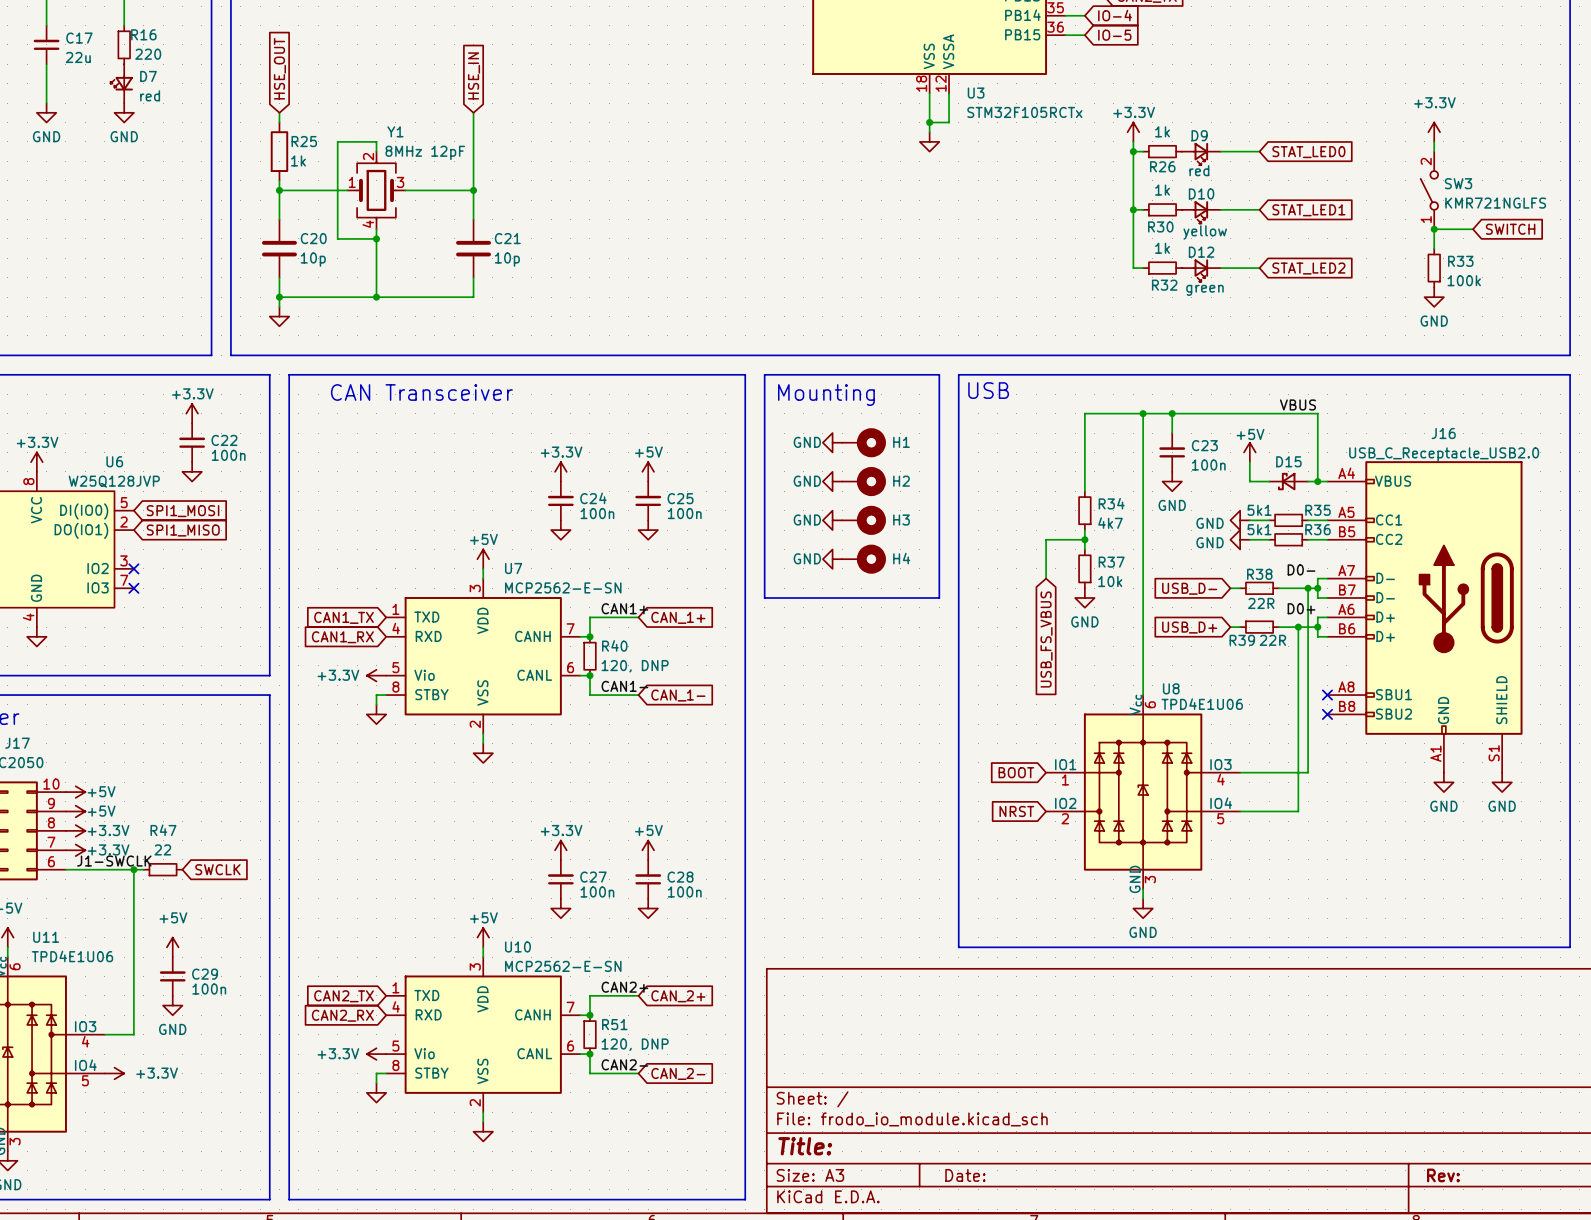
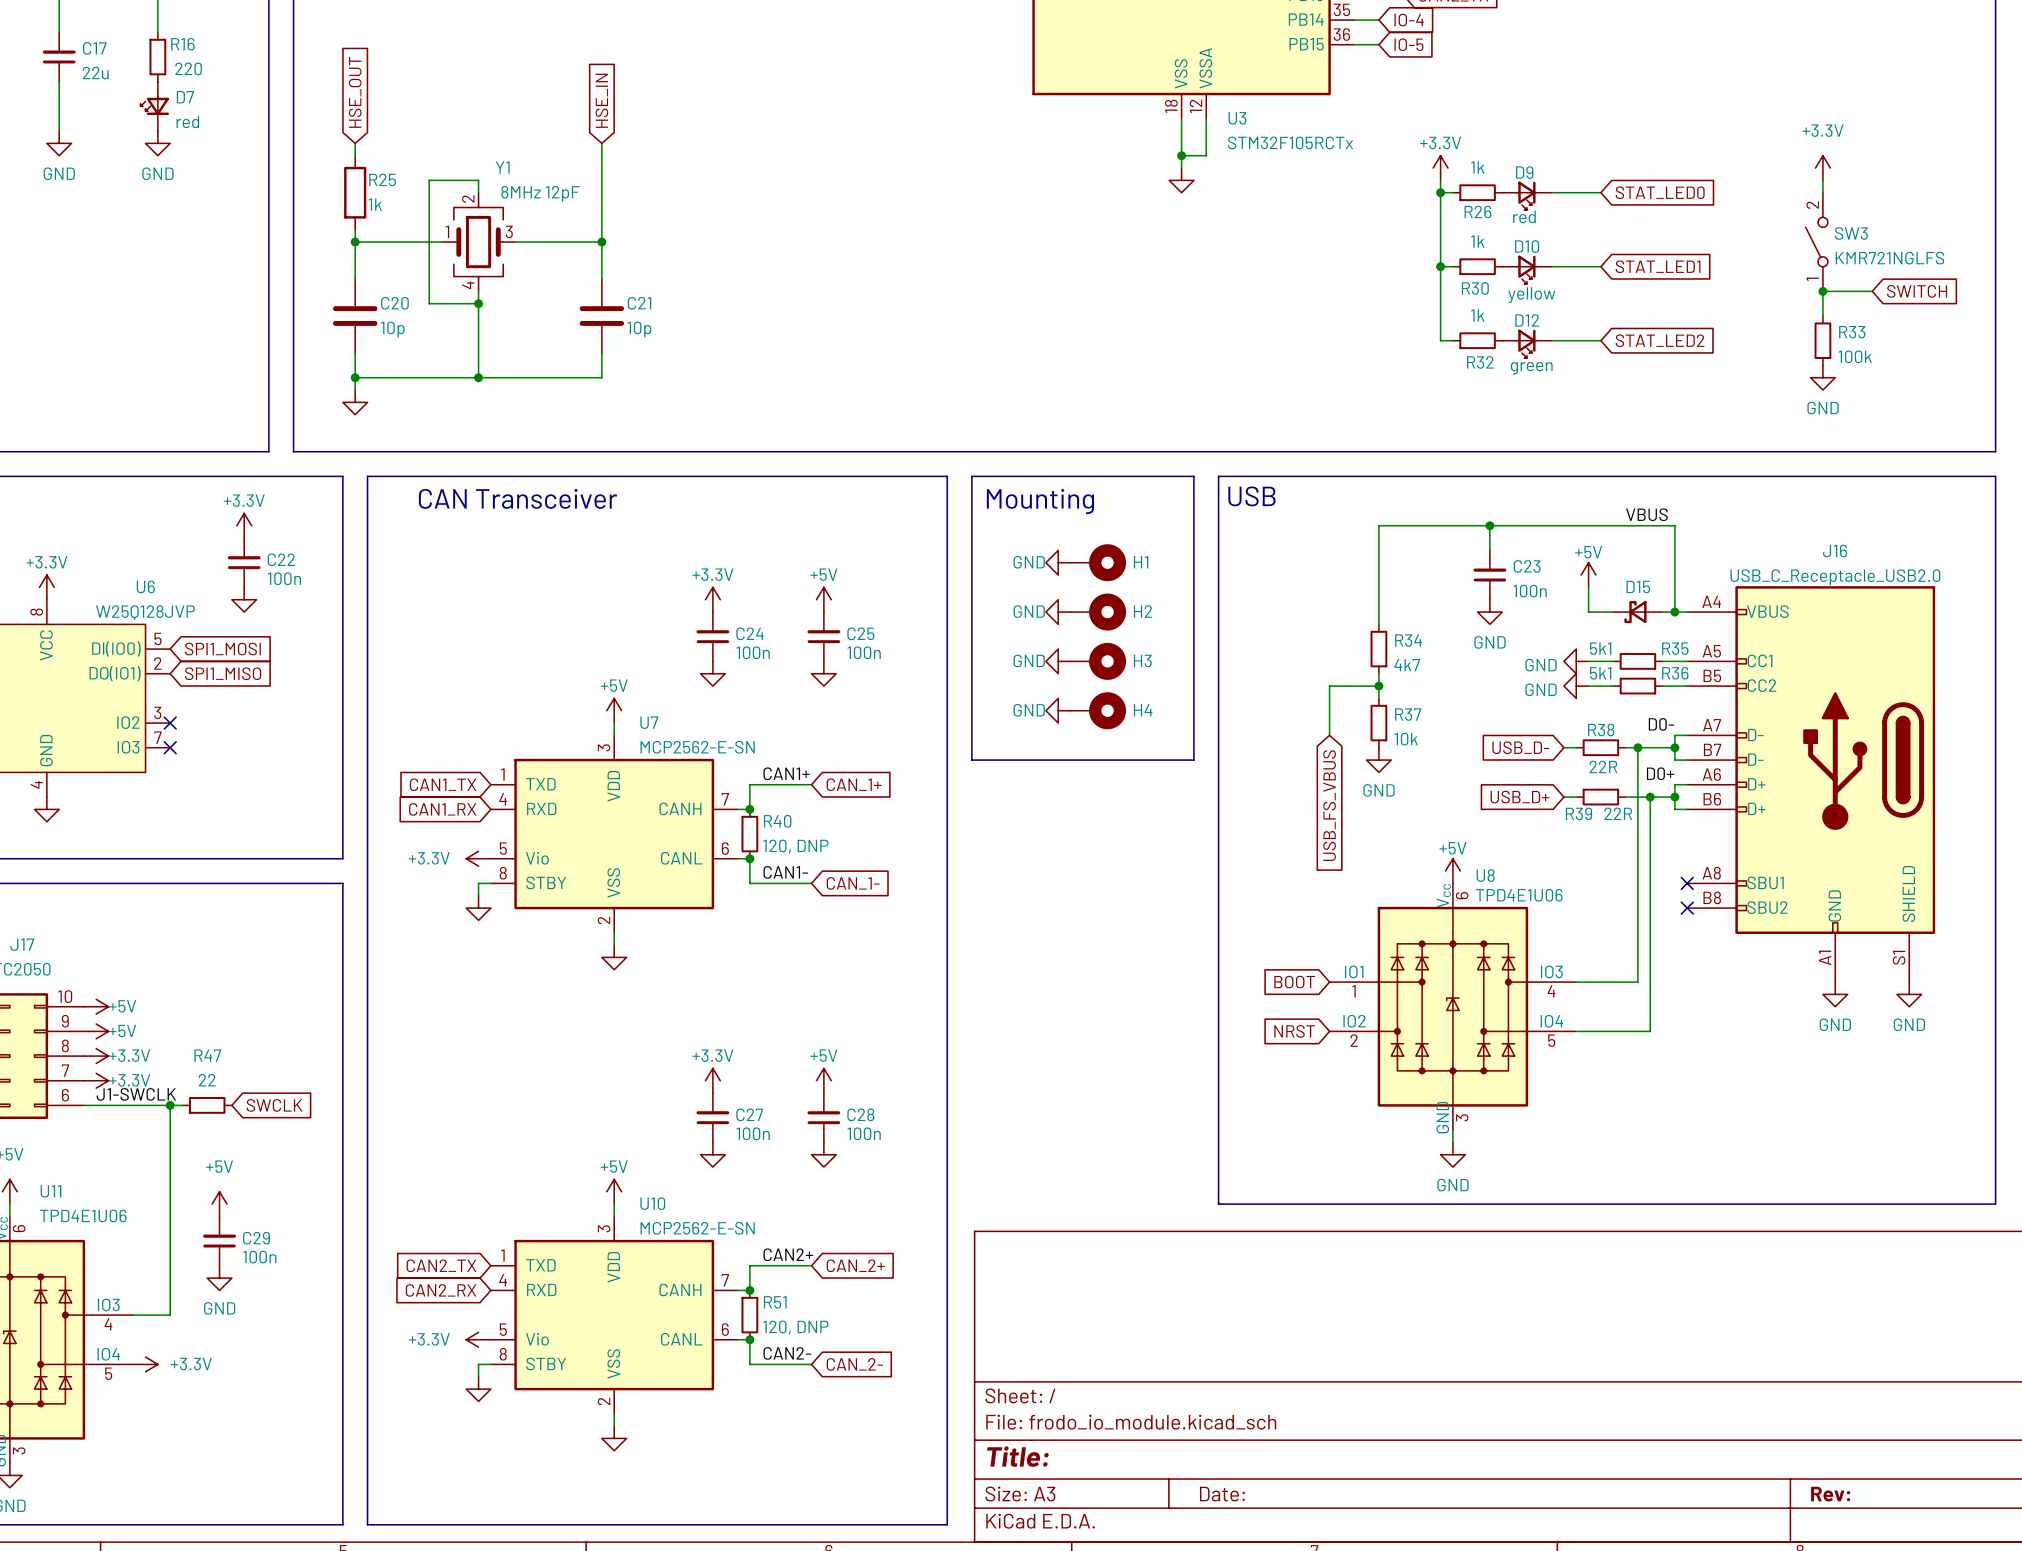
wire: (1143, 413) (1143, 695) -> none
junction: (1143, 413) -> none
wire: (1308, 588) (1308, 772) (1288, 772) -> (1637, 747) (1637, 982)
junction position: (1308, 588) -> (1637, 747)
power symbol: none -> +5V (1452, 871)

